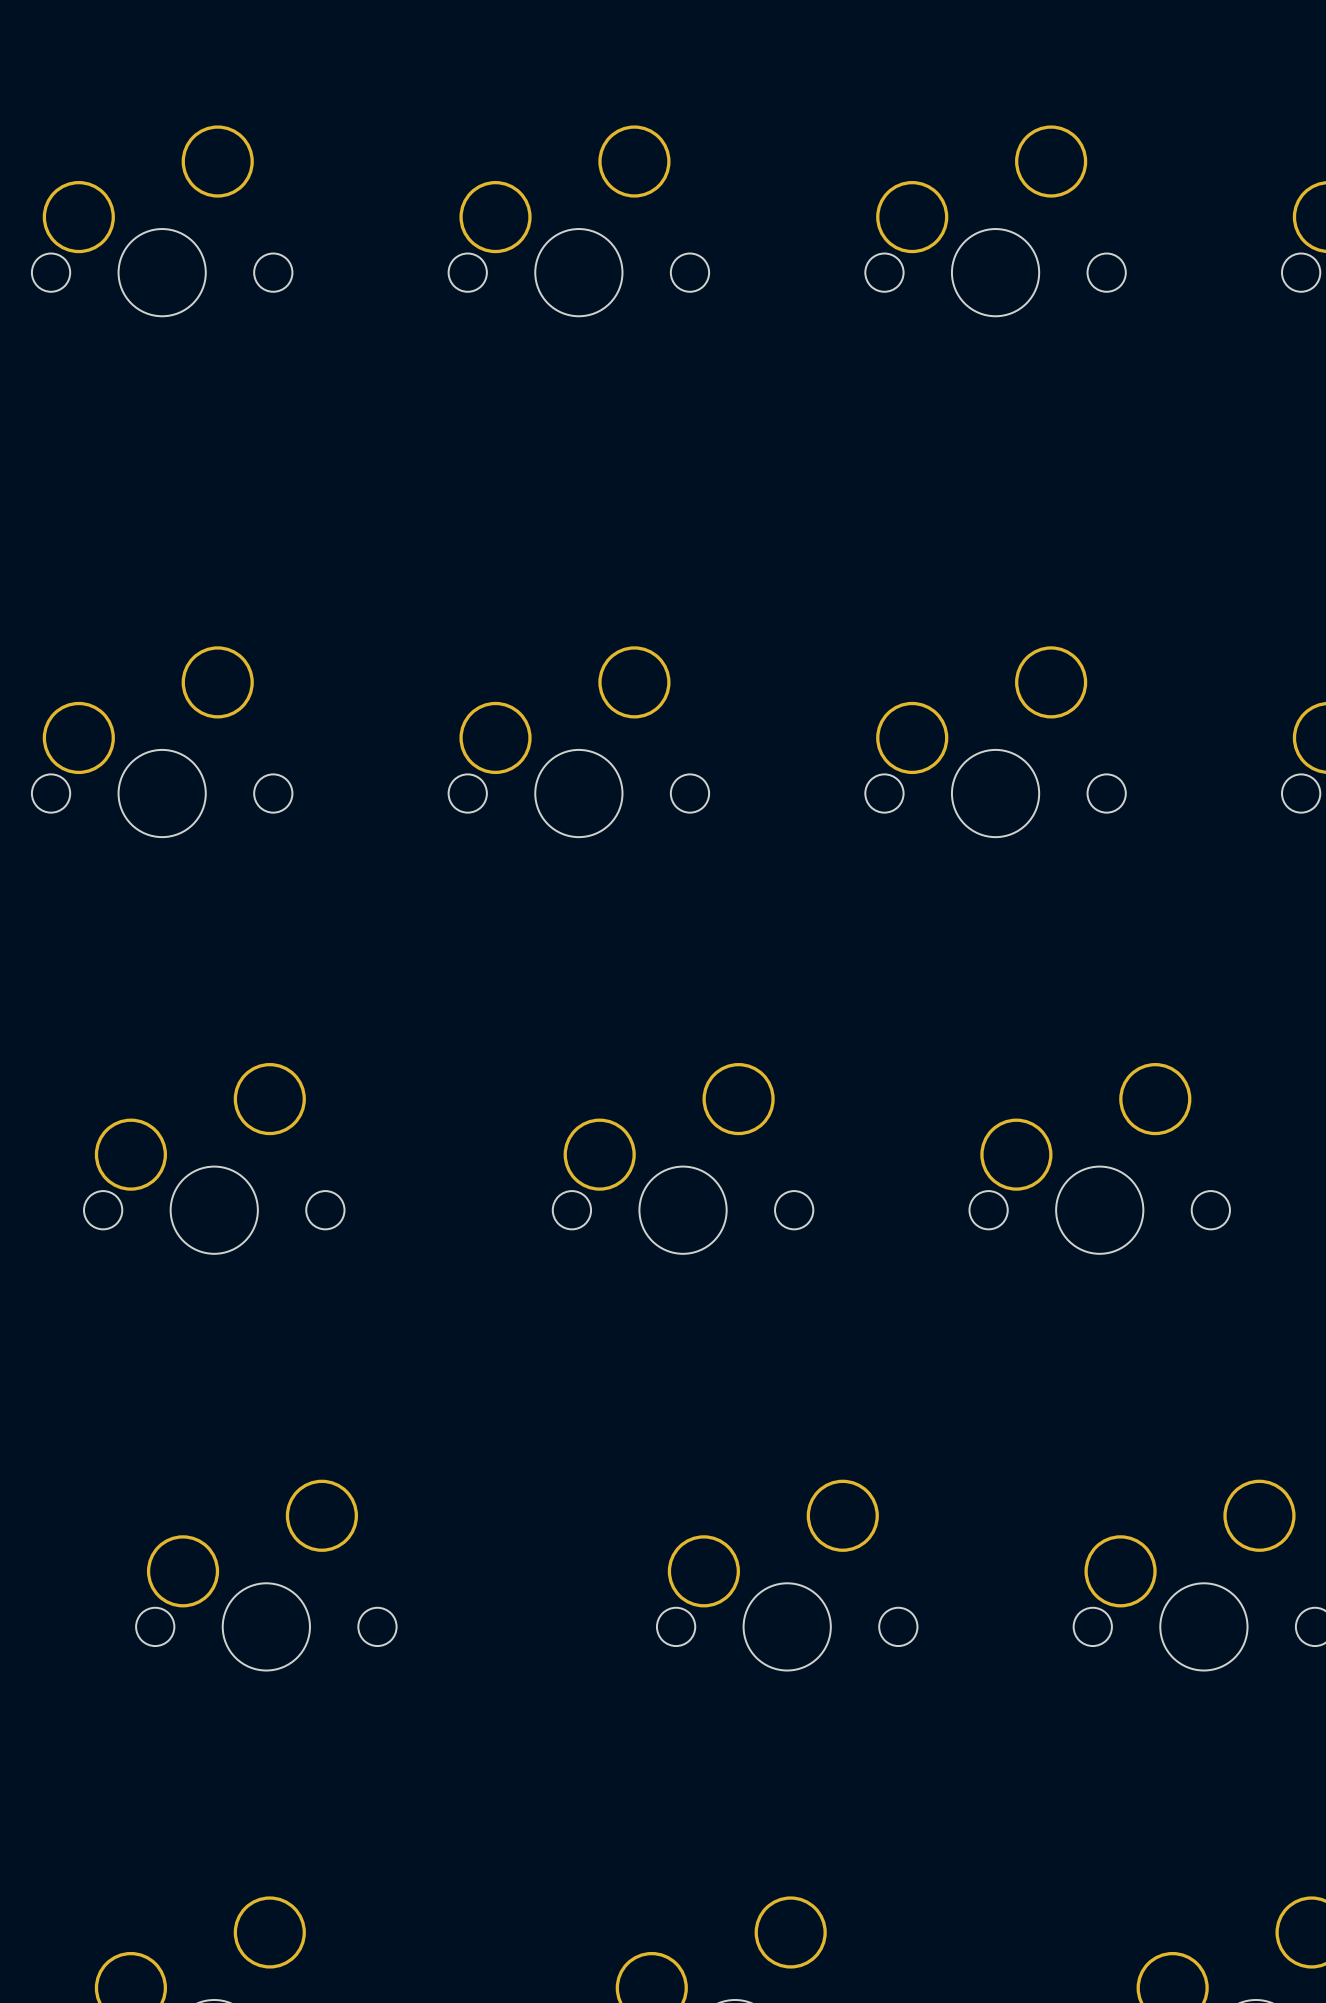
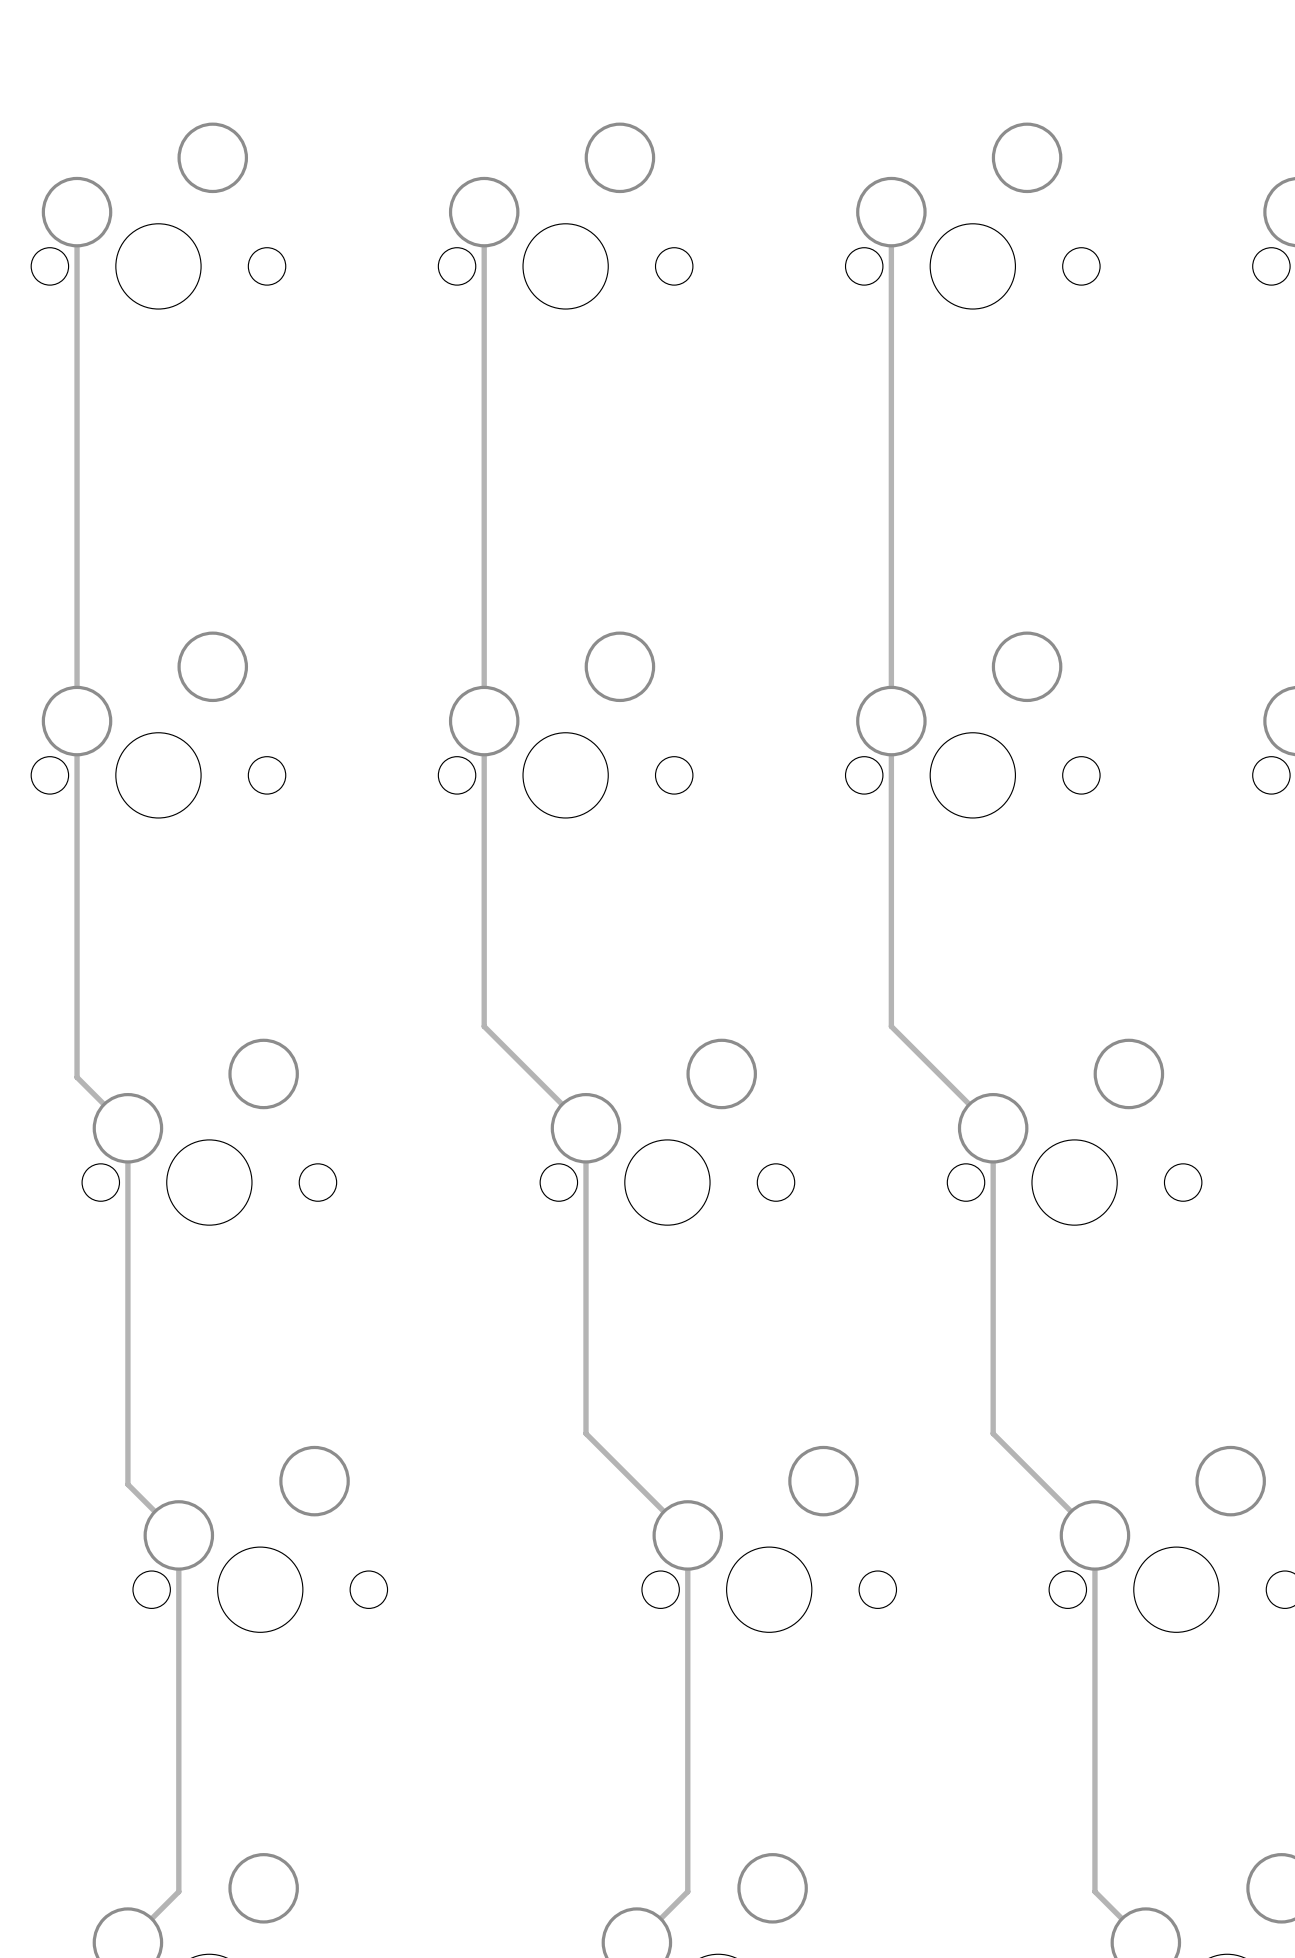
track: none -> (77, 212) (77, 1077) (127, 1128) (127, 1484) (178, 1535) (178, 1891) (127, 1942)
track: none -> (484, 212) (484, 1026) (585, 1128) (585, 1433) (687, 1535) (687, 1891) (636, 1942)
track: none -> (891, 212) (891, 1026) (993, 1128) (993, 1433) (1094, 1535) (1094, 1891) (1145, 1942)

